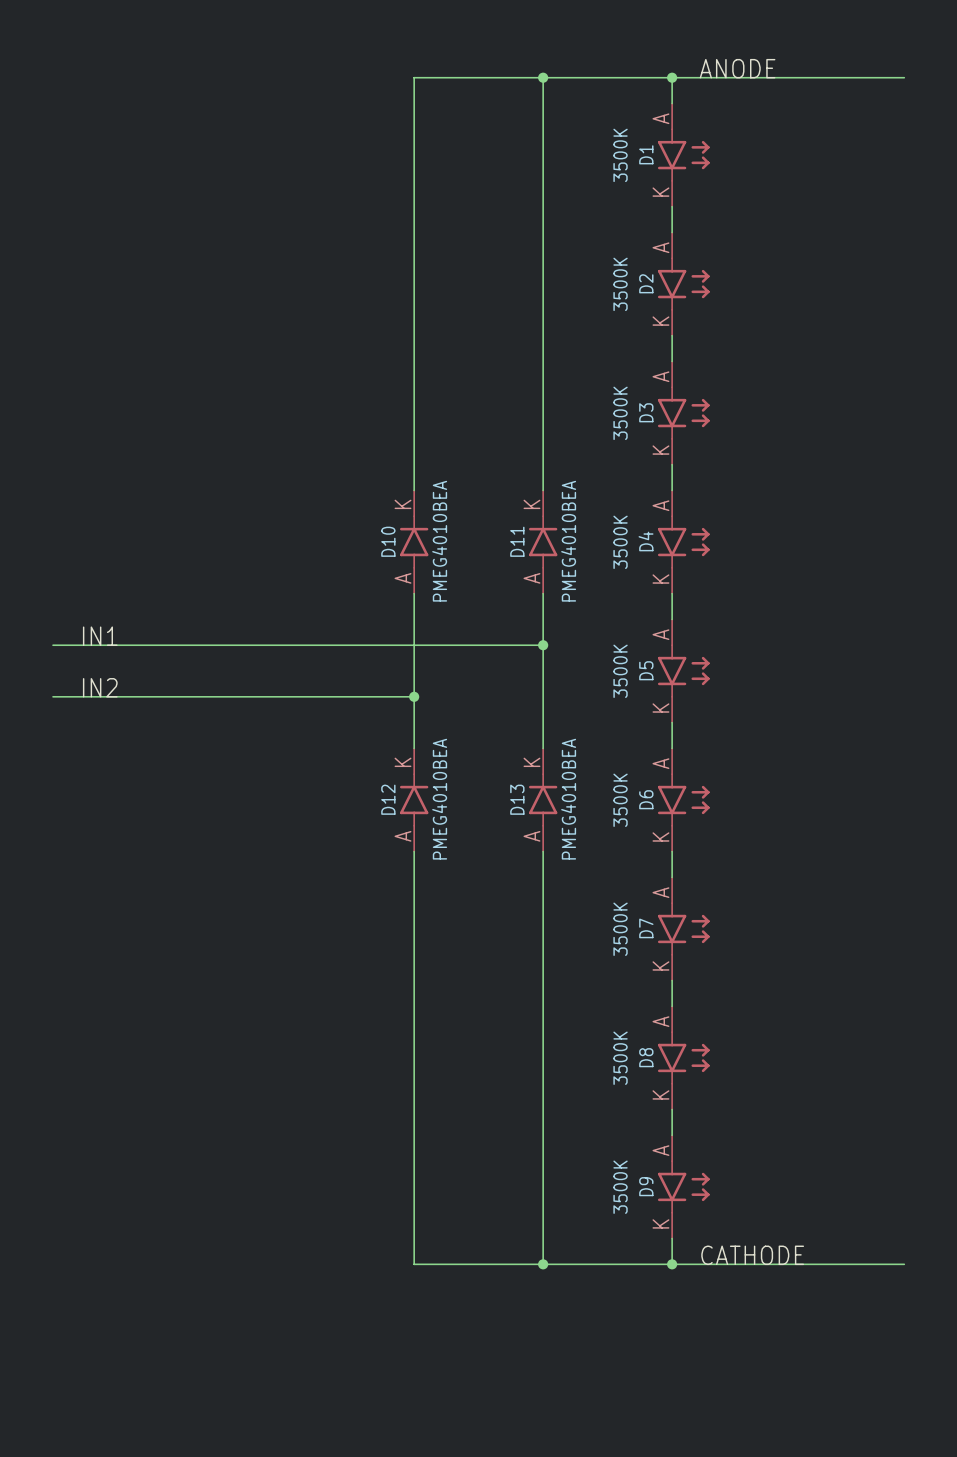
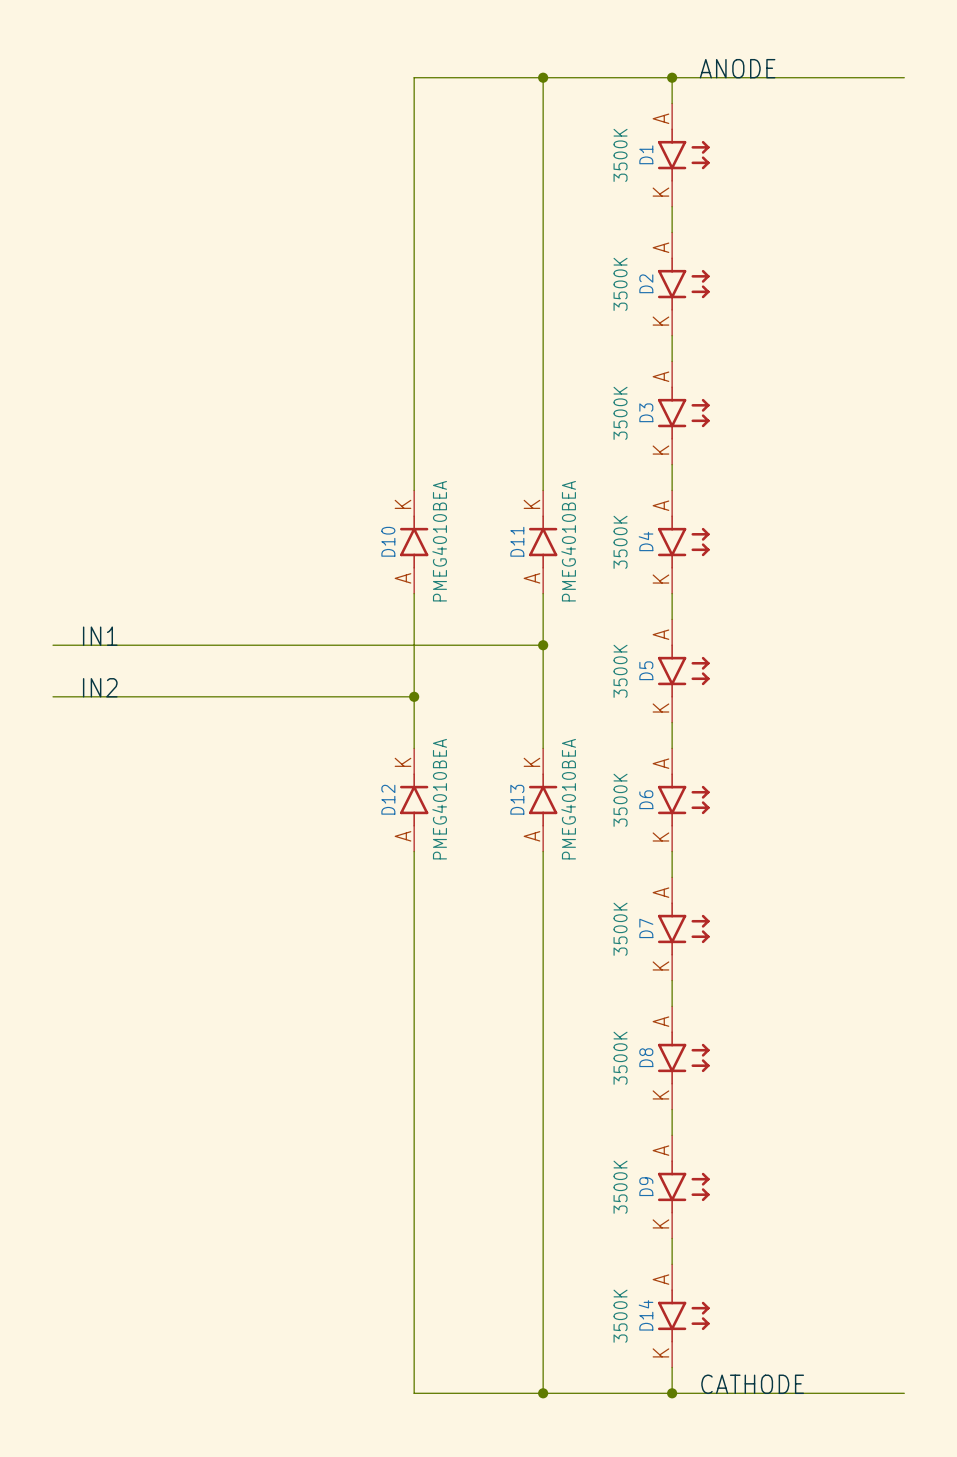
label position: CATHODE (752, 1255) -> CATHODE (752, 1384)
wire: (414, 1264) (904, 1264) -> (414, 1264) (414, 1393) (904, 1393)
wire: none -> (543, 1264) (543, 1393)
junction: (543, 1264) -> none
junction: (672, 1264) -> none
D14: none -> 3500K (683, 1315)
wire: none -> (672, 1367) (672, 1393)
junction: none -> (543, 1393)
junction: none -> (672, 1393)

